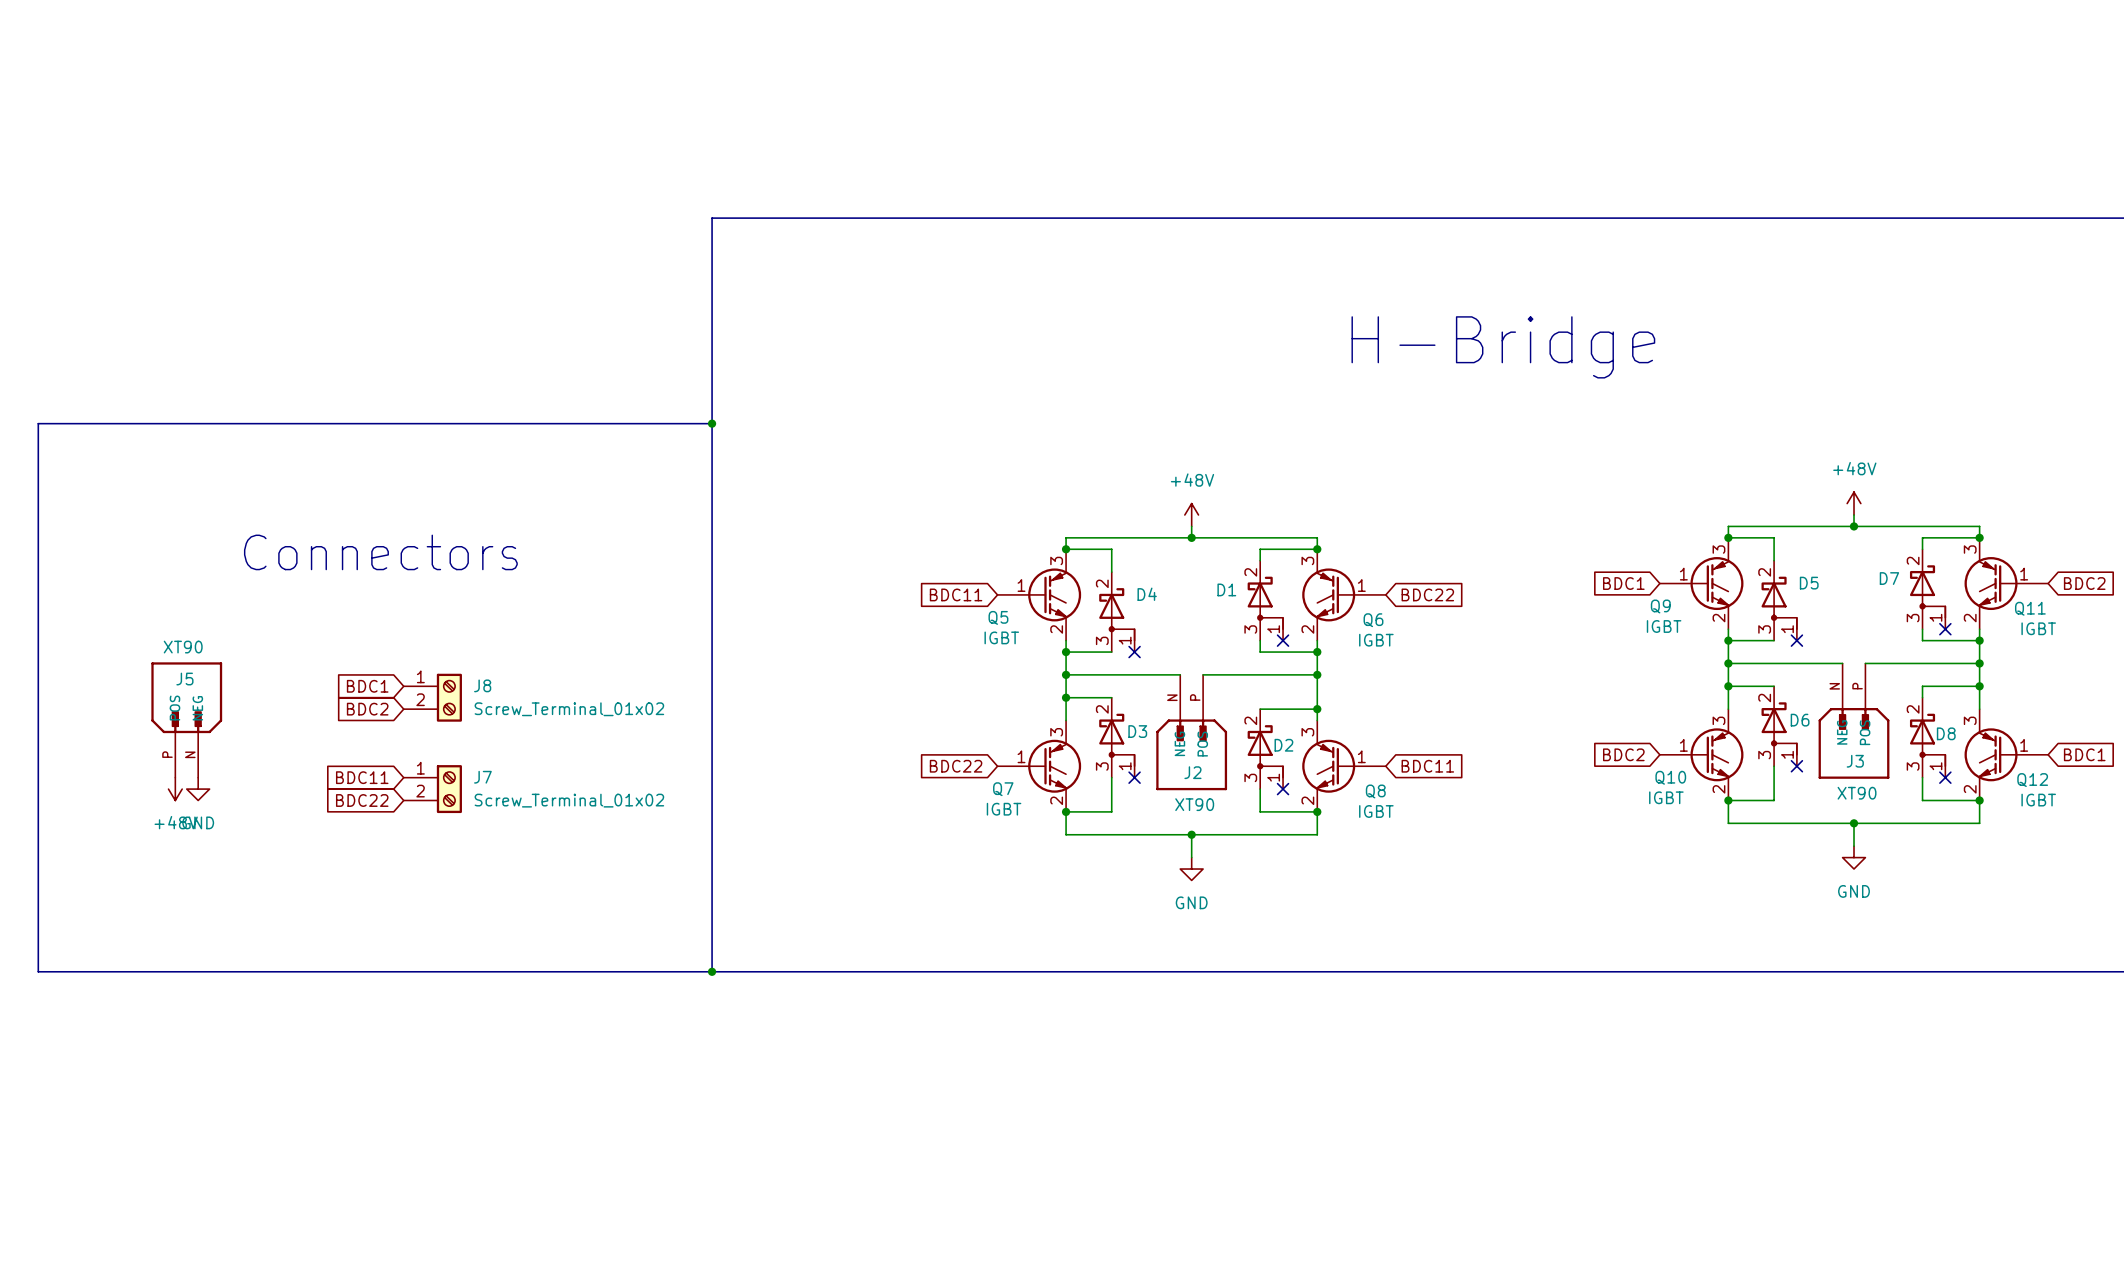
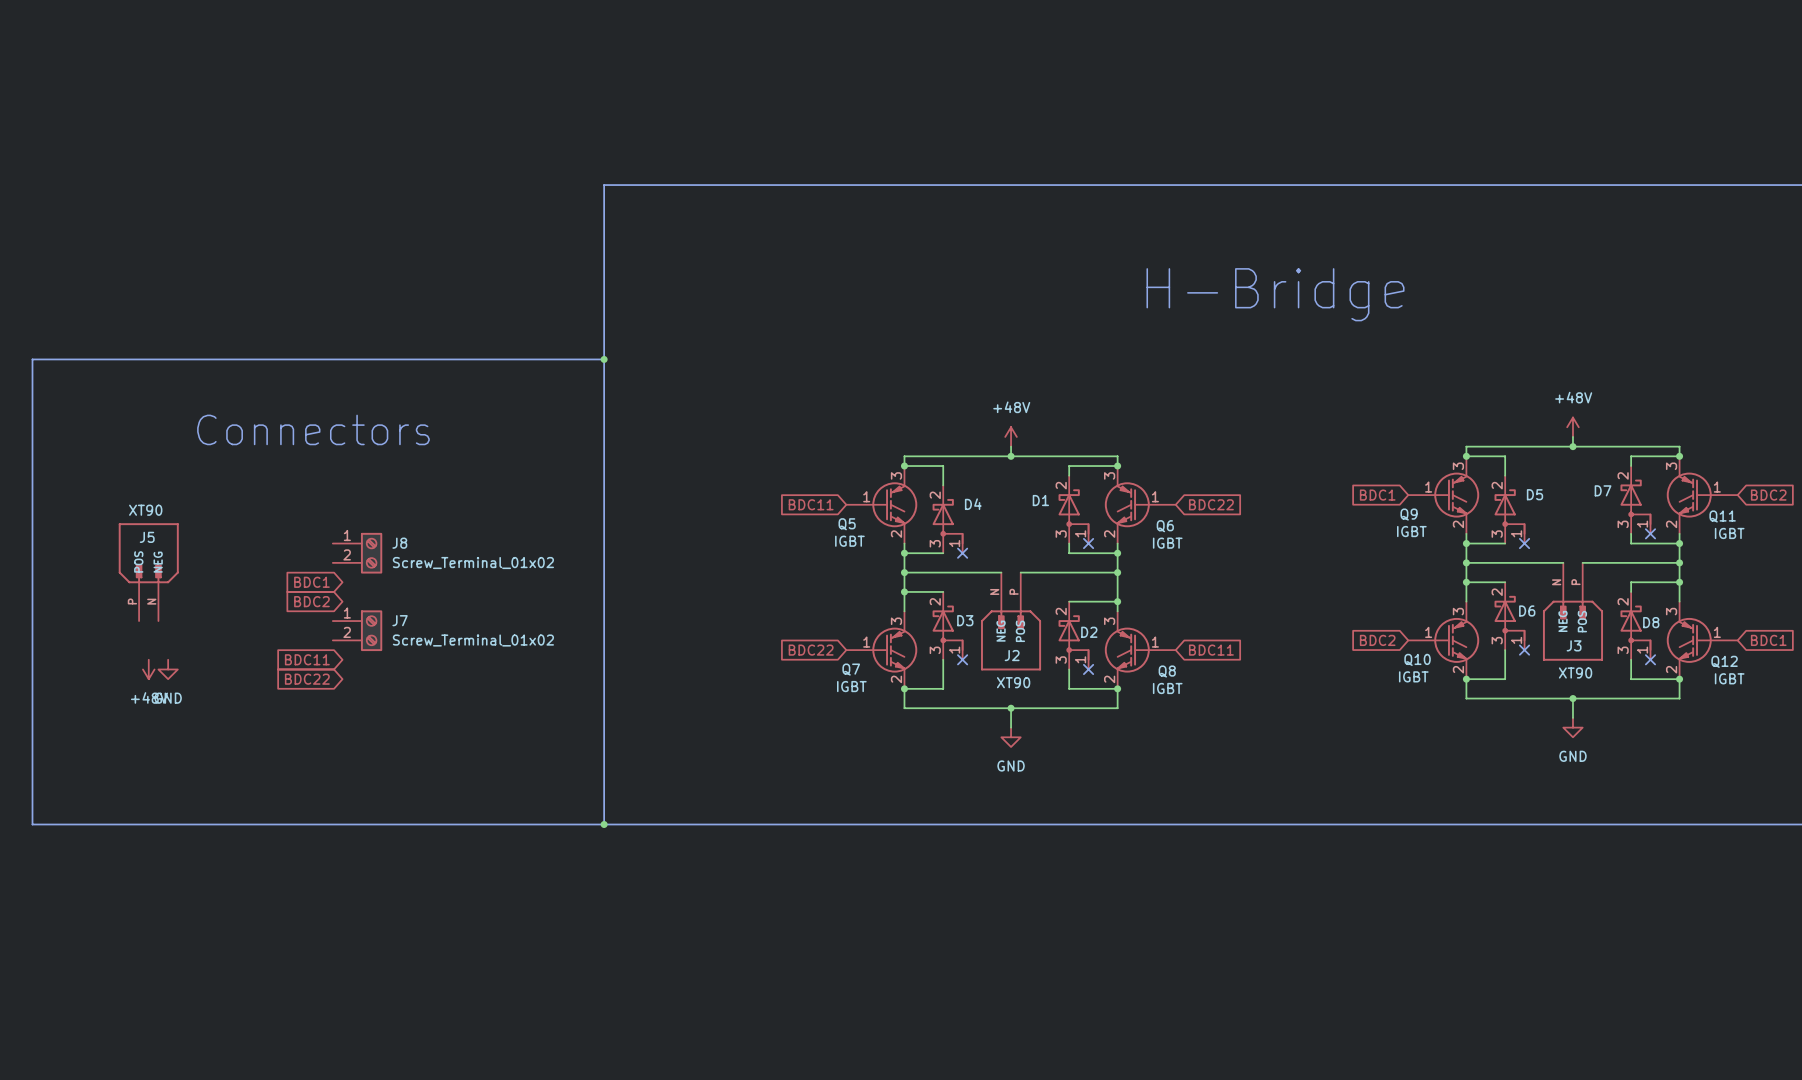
text position: Connectors (380, 552) -> Connectors (313, 429)
J8 position: (432, 697) -> (357, 553)
J5 position: (186, 719) -> (148, 572)
J7 position: (432, 789) -> (357, 630)

